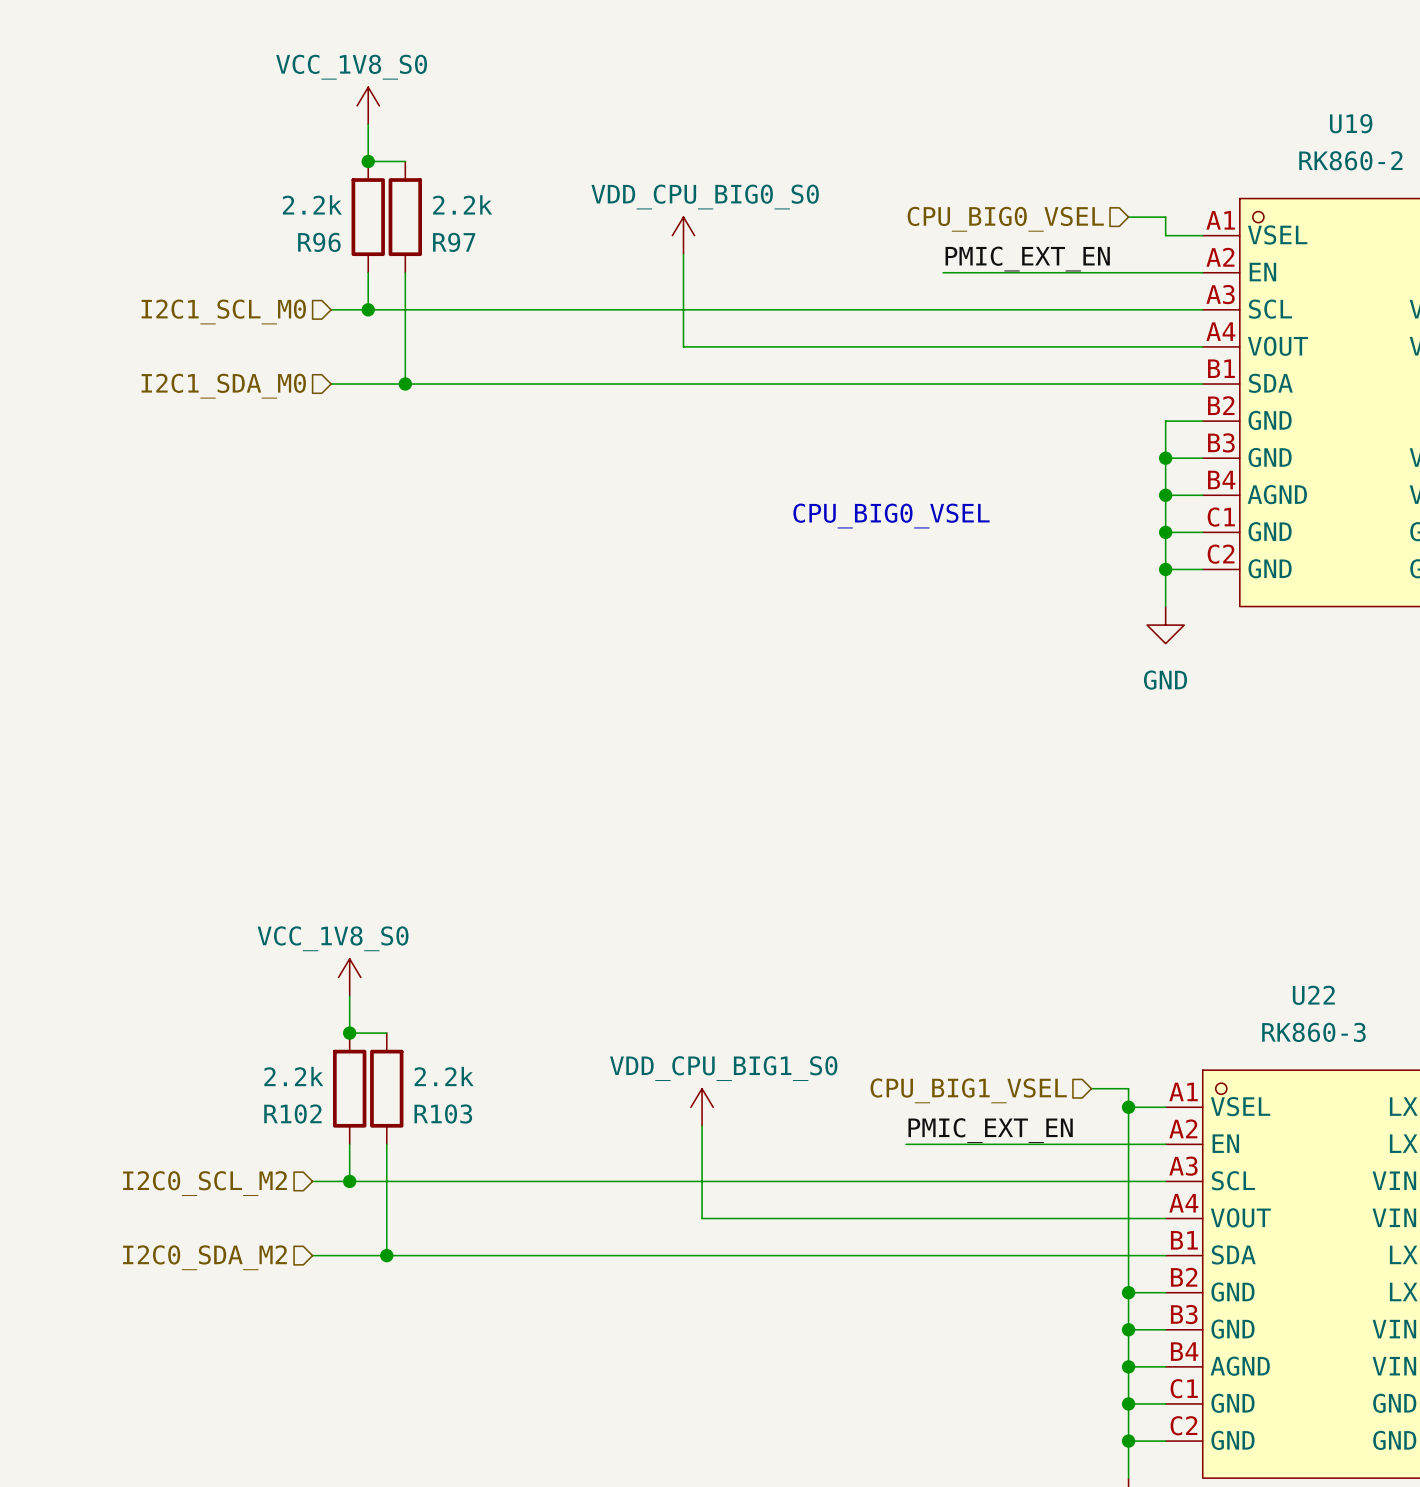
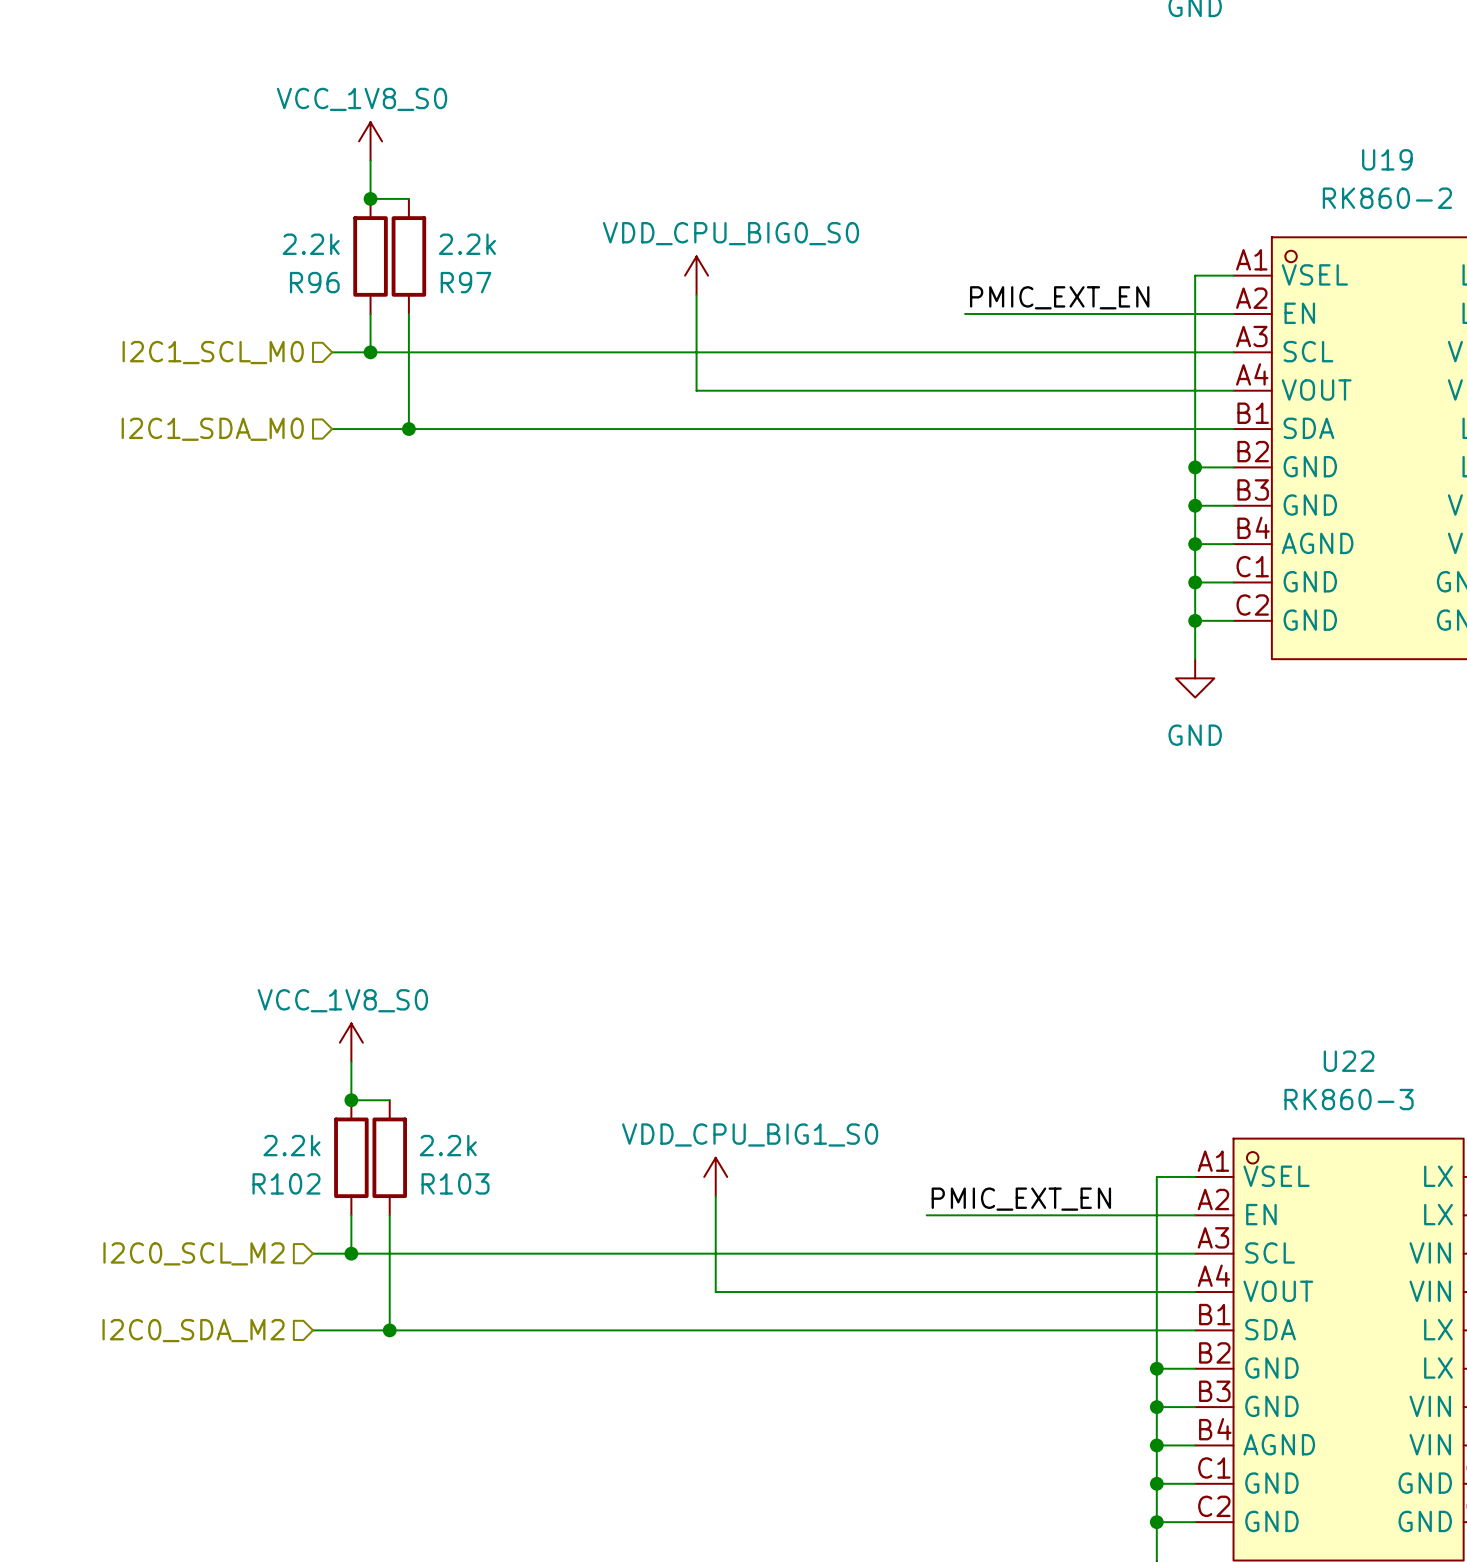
wire: (1128, 217) (1165, 217) (1165, 235) -> (1195, 467) (1195, 275)
hierarchical label: CPU_BIG0_VSEL (1005, 219) -> none
junction: none -> (1195, 467)
text: CPU_BIG0_VSEL (891, 516) -> none
wire: (1091, 1088) (1128, 1088) (1128, 1107) -> none
hierarchical label: CPU_BIG1_VSEL (968, 1090) -> none
junction: (1128, 1107) -> none

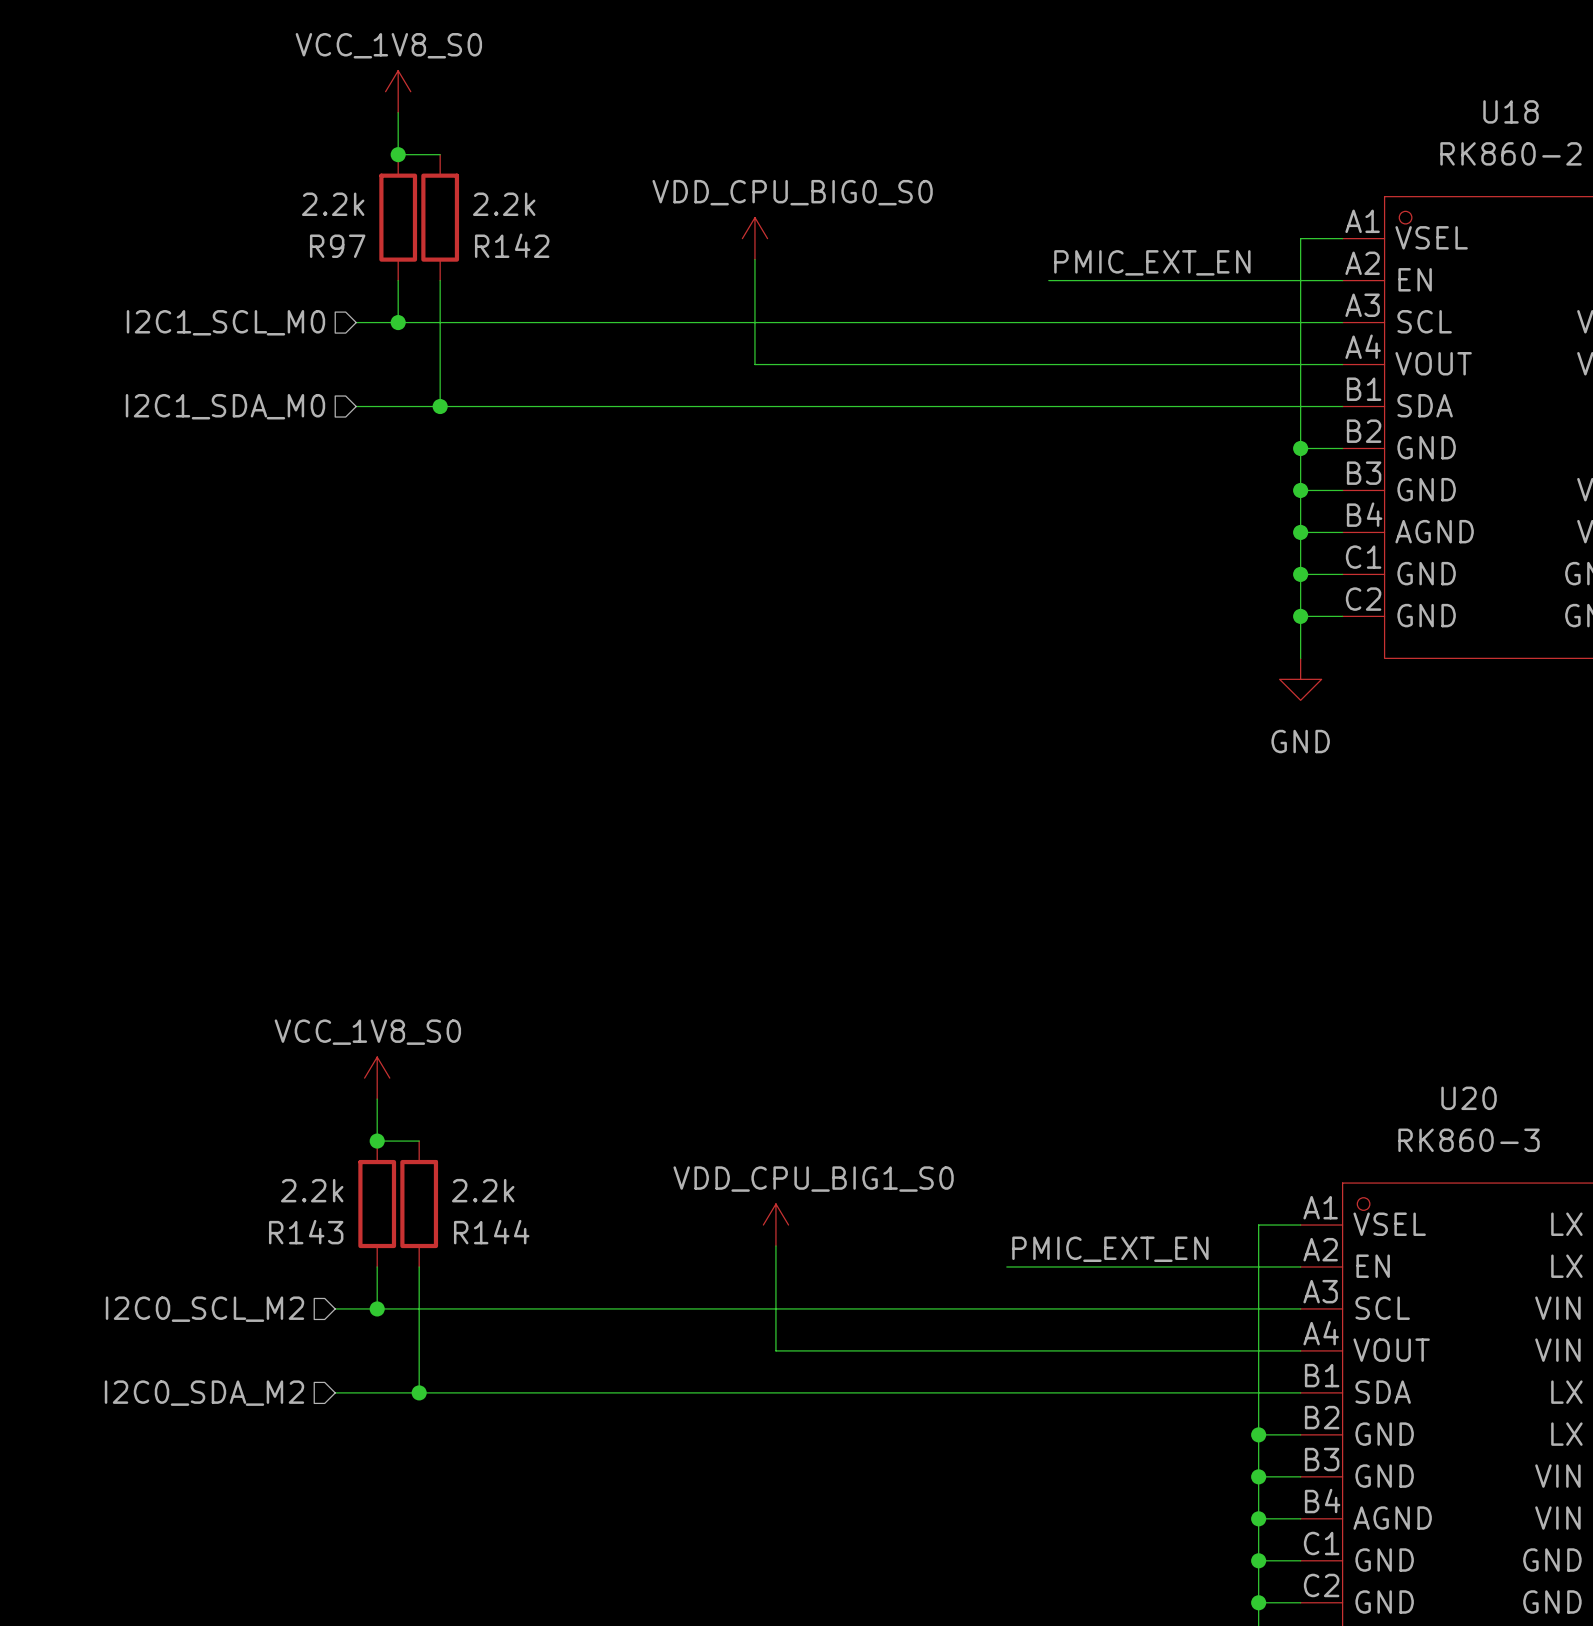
U19 name: U19 (1387, 159) -> U18 (1511, 111)
R96 name: R96 (314, 282) -> R97 (337, 246)
R97 name: R97 (466, 282) -> R142 (512, 245)
U22 name: U22 (1349, 1061) -> U20 (1469, 1098)
R102 name: R102 (286, 1183) -> R143 (306, 1232)
R103 name: R103 (455, 1183) -> R144 (491, 1232)

